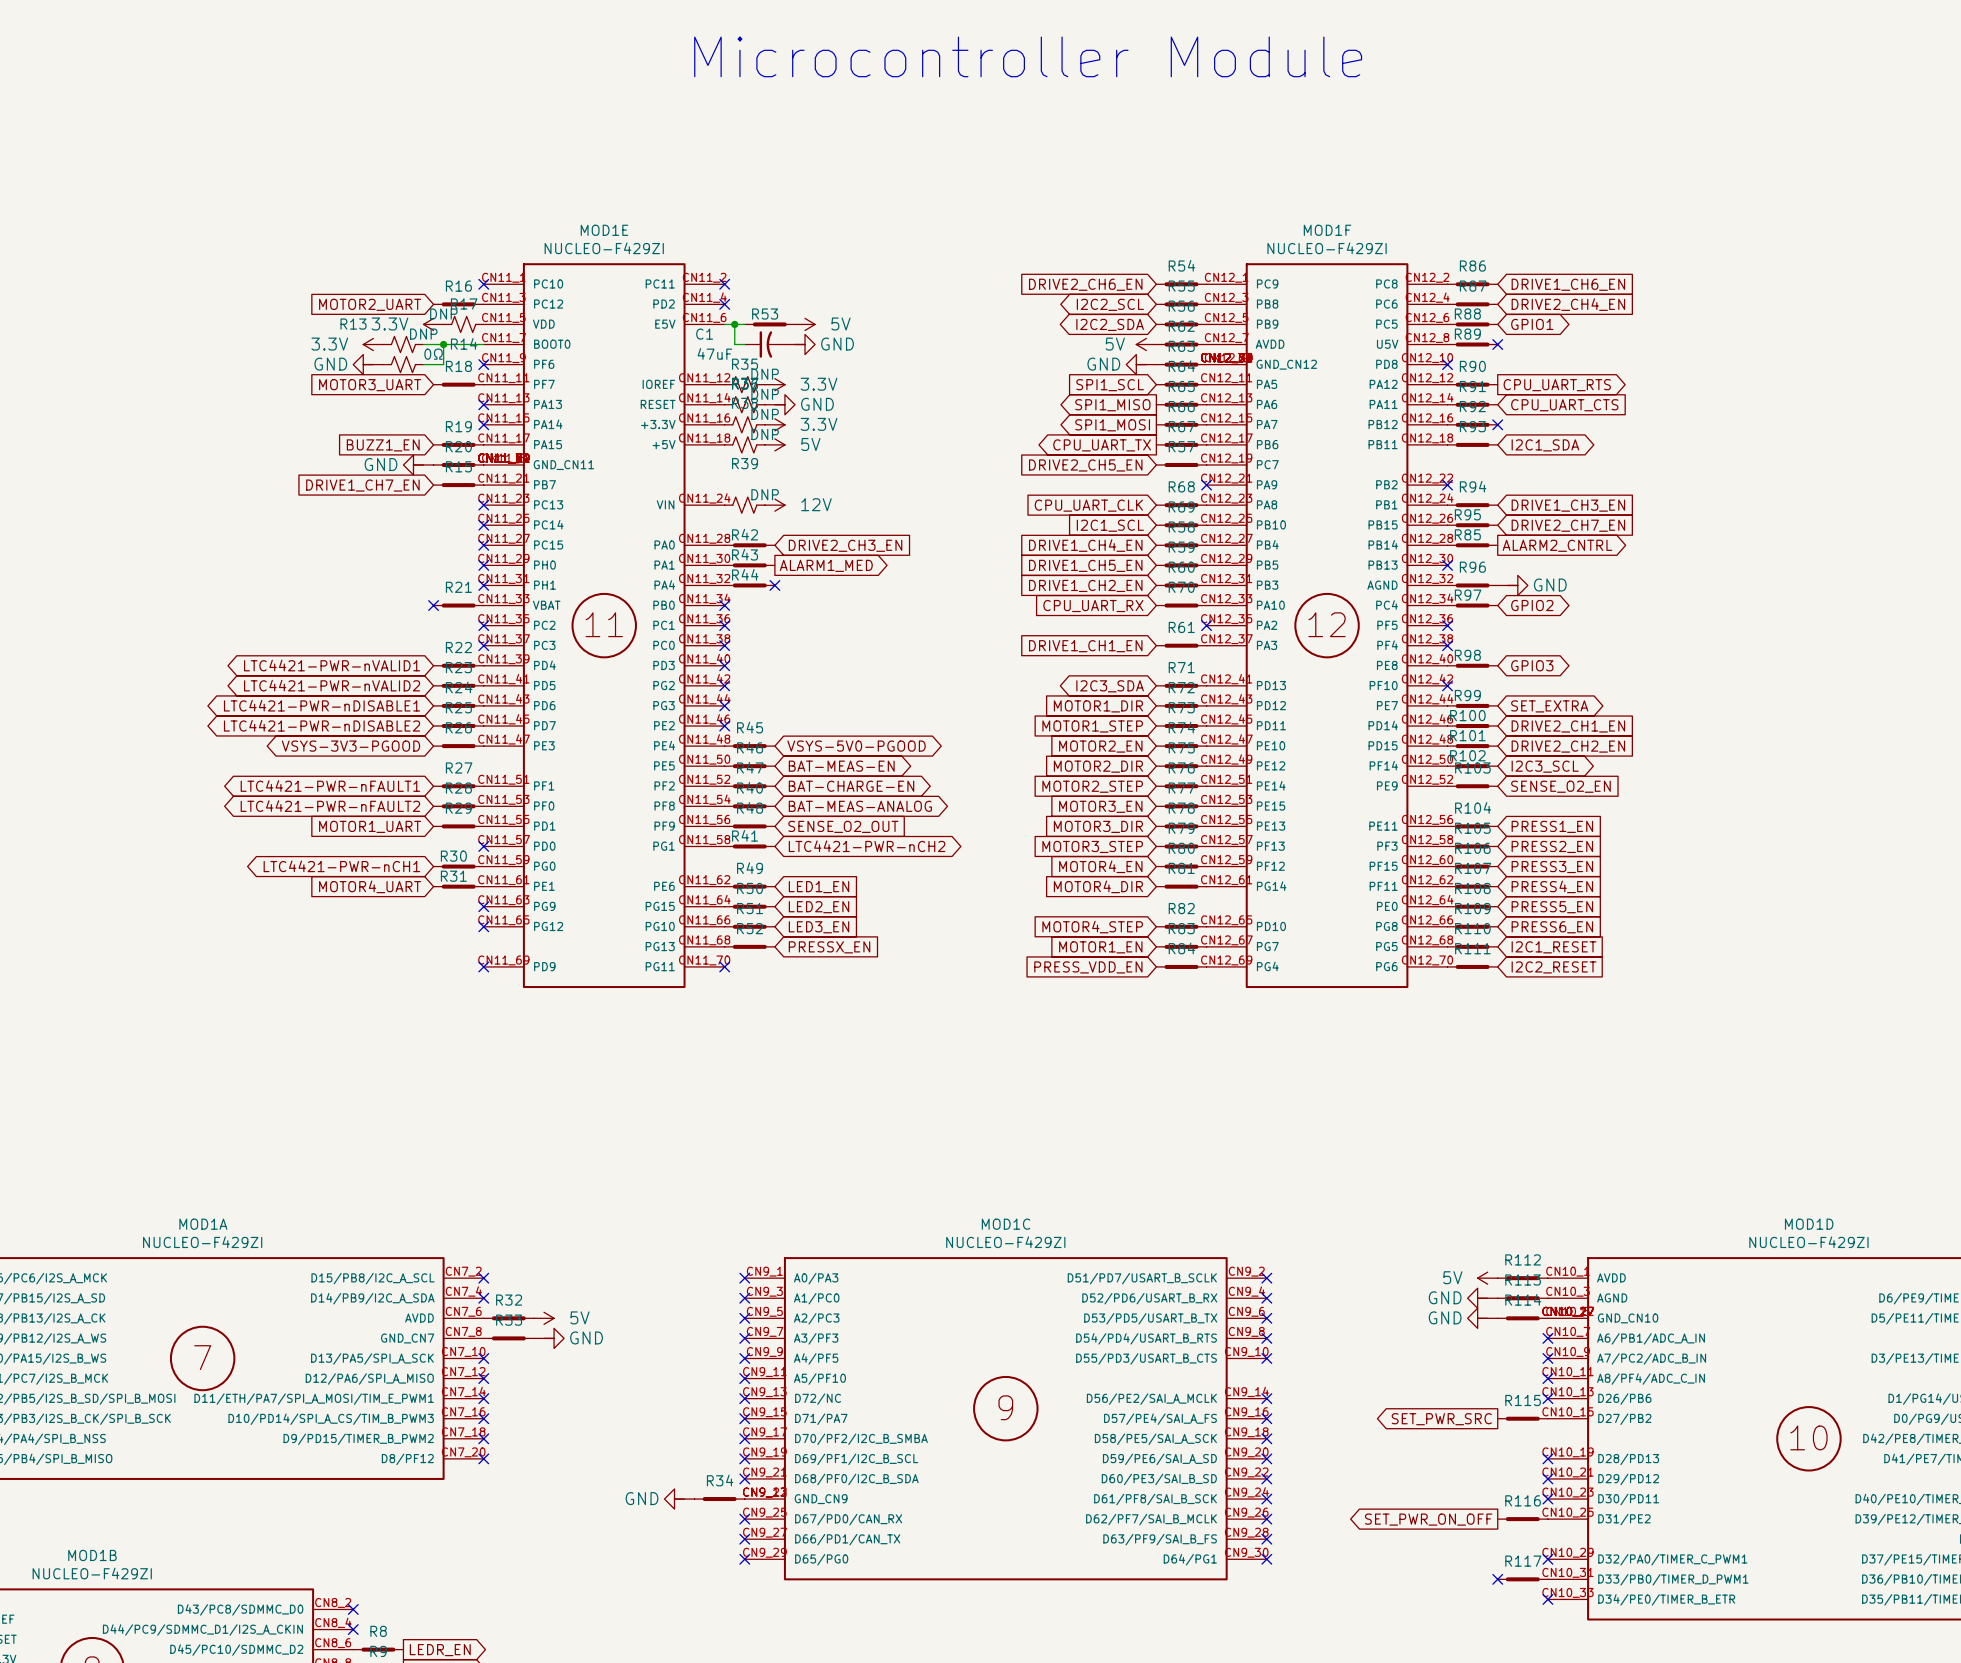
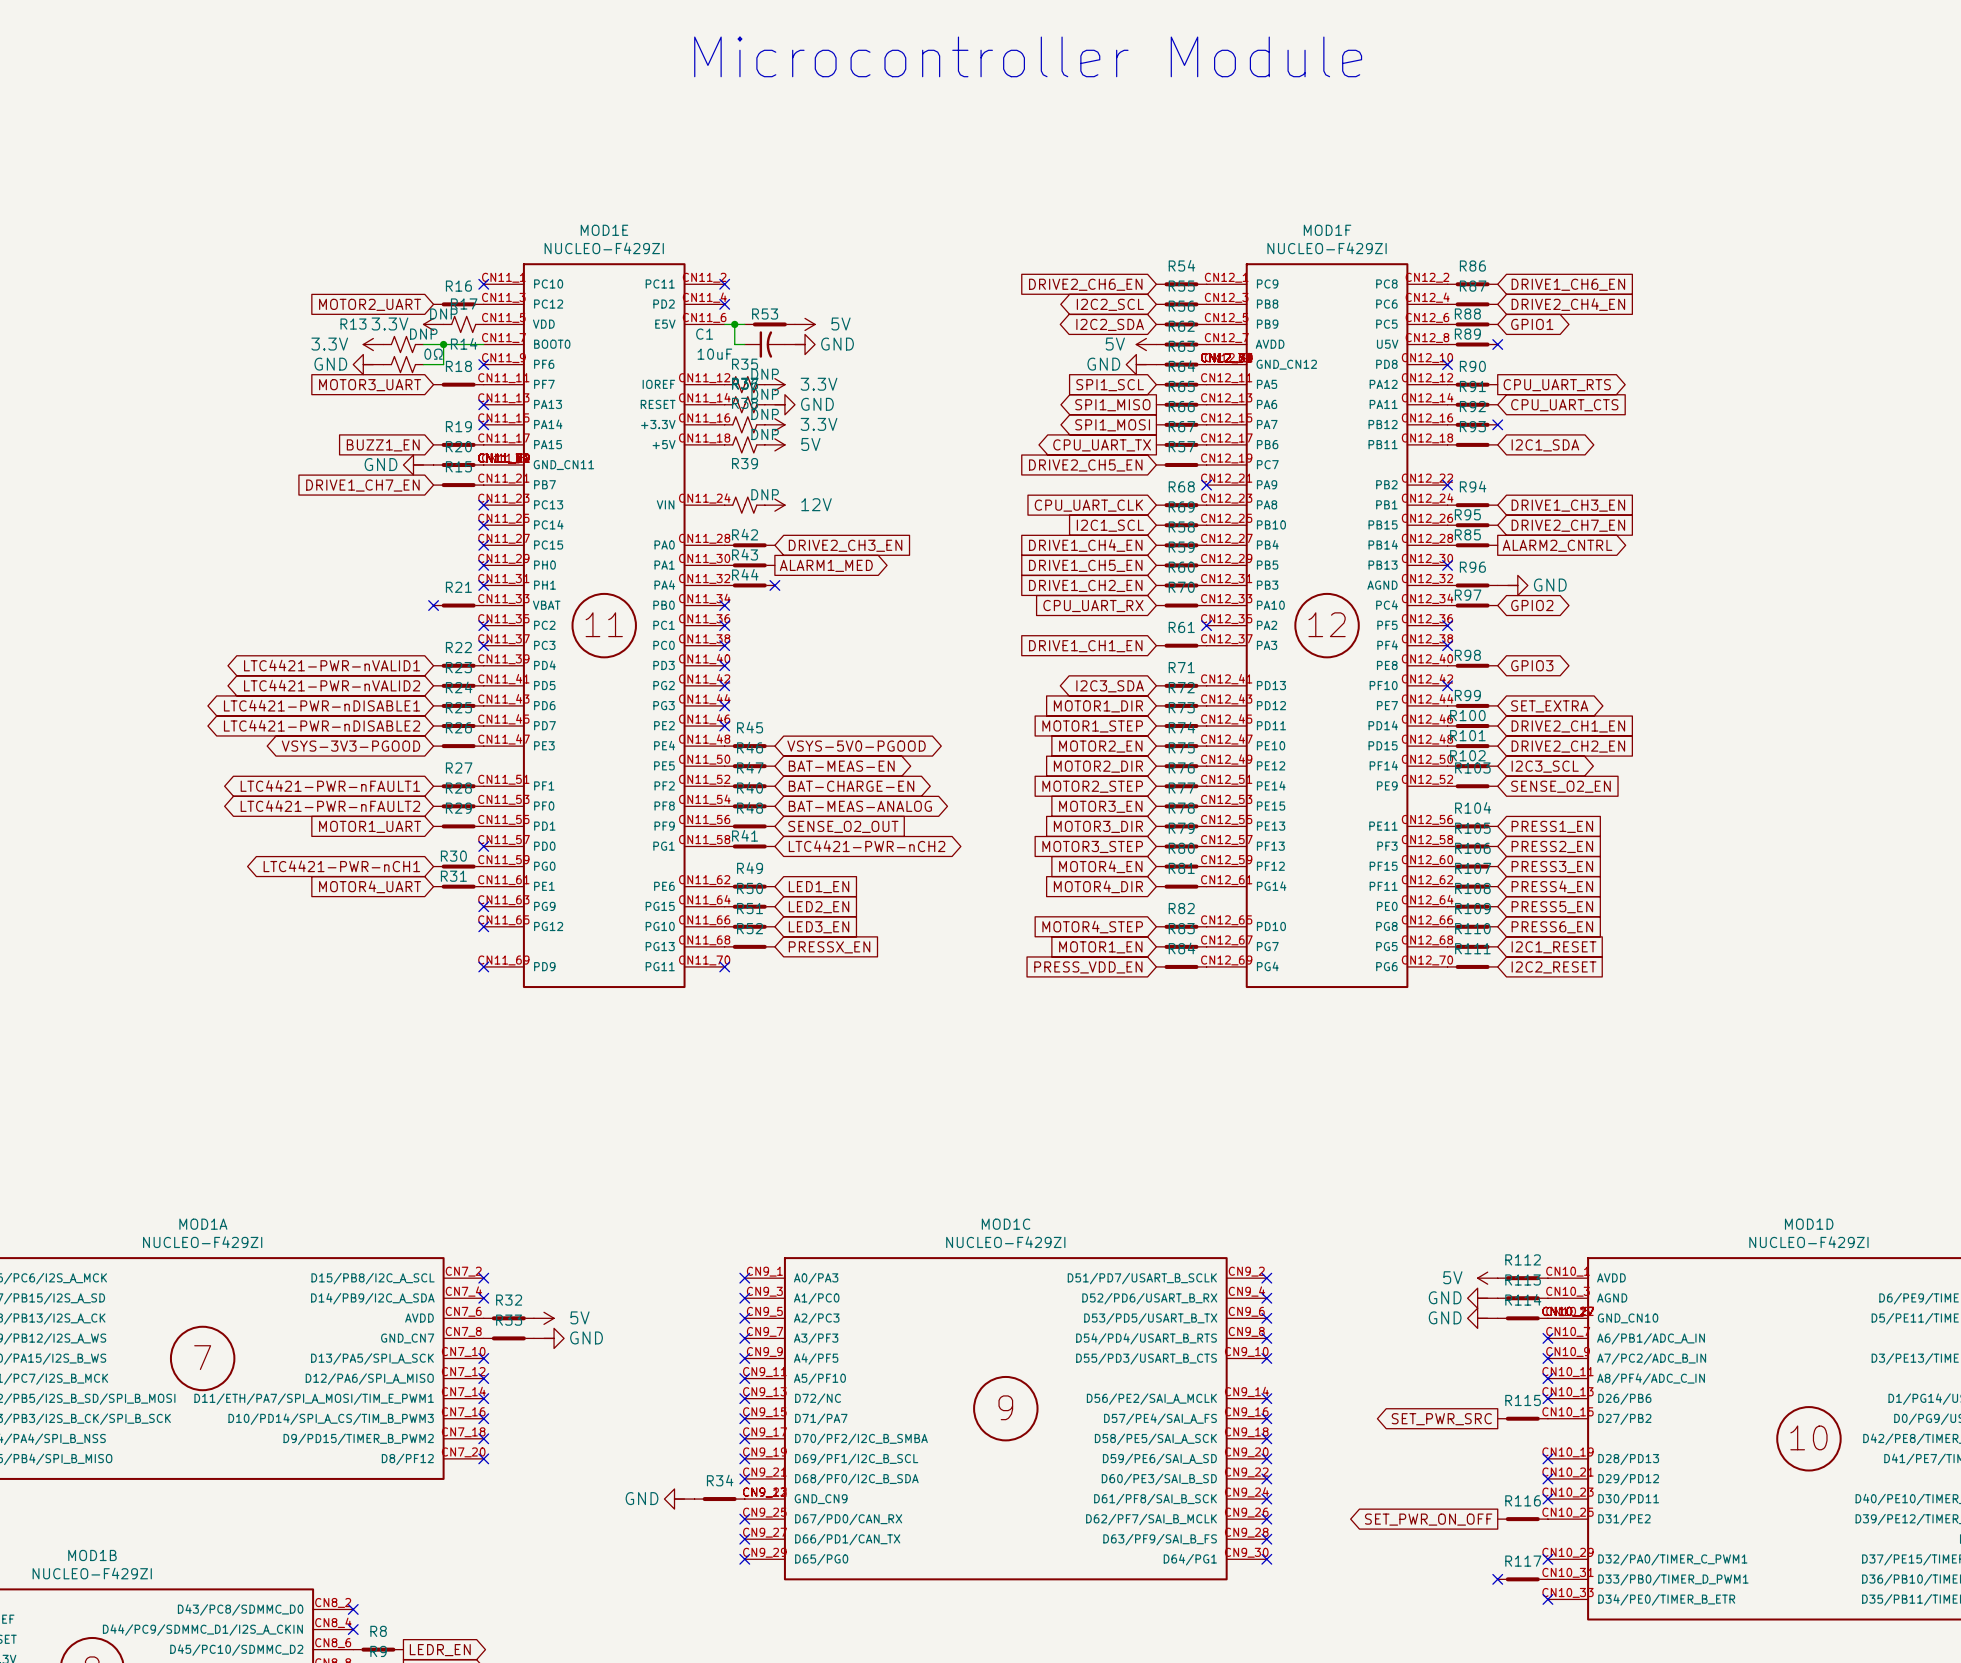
C1 text: 47uF (714, 353) -> 10uF (714, 354)

